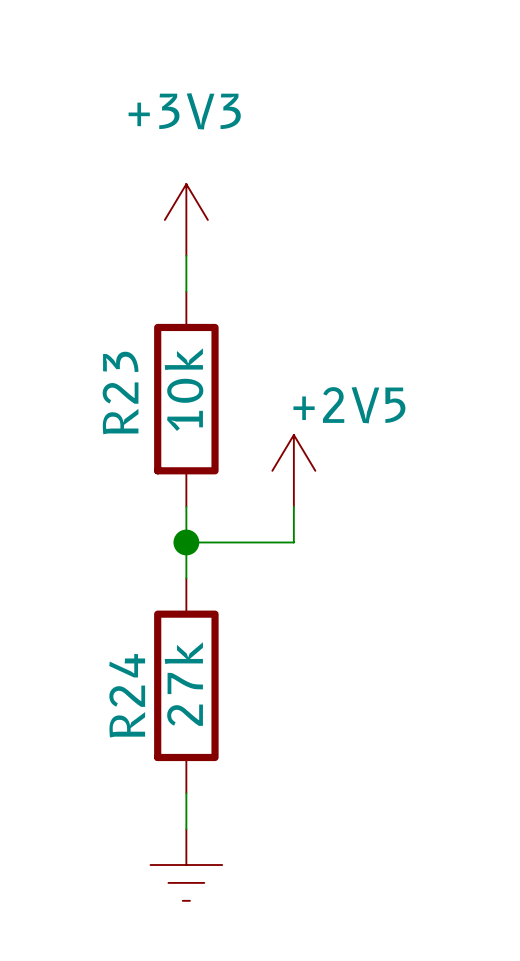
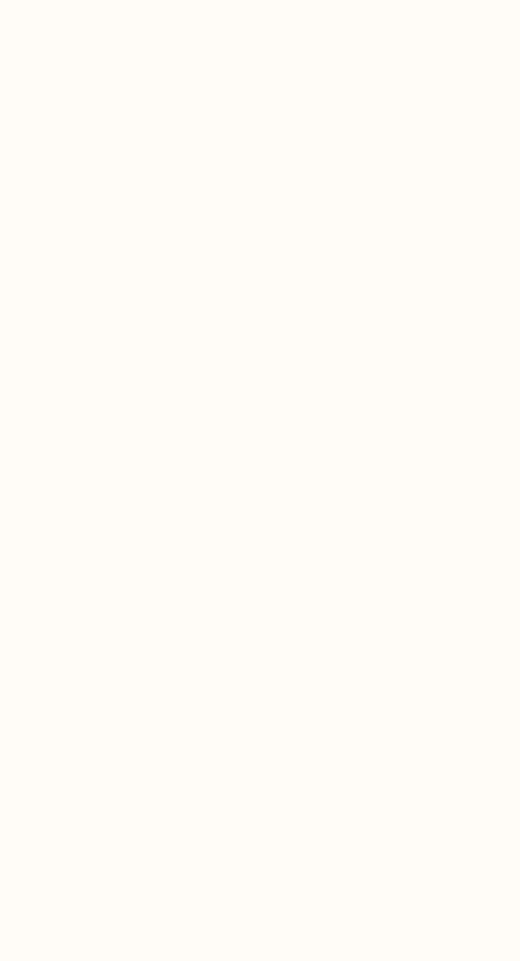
power symbol: +3V3 (186, 219) -> none
wire: (186, 255) (186, 291) -> none
R23: 10k (186, 399) -> none
power symbol: +2V5 (293, 470) -> none
wire: (186, 506) (186, 578) -> none
wire: (293, 506) (293, 542) (186, 542) -> none
junction: (186, 542) -> none
R24: 27k (186, 685) -> none
wire: (186, 793) (186, 829) -> none
power symbol: (186, 865) -> none

